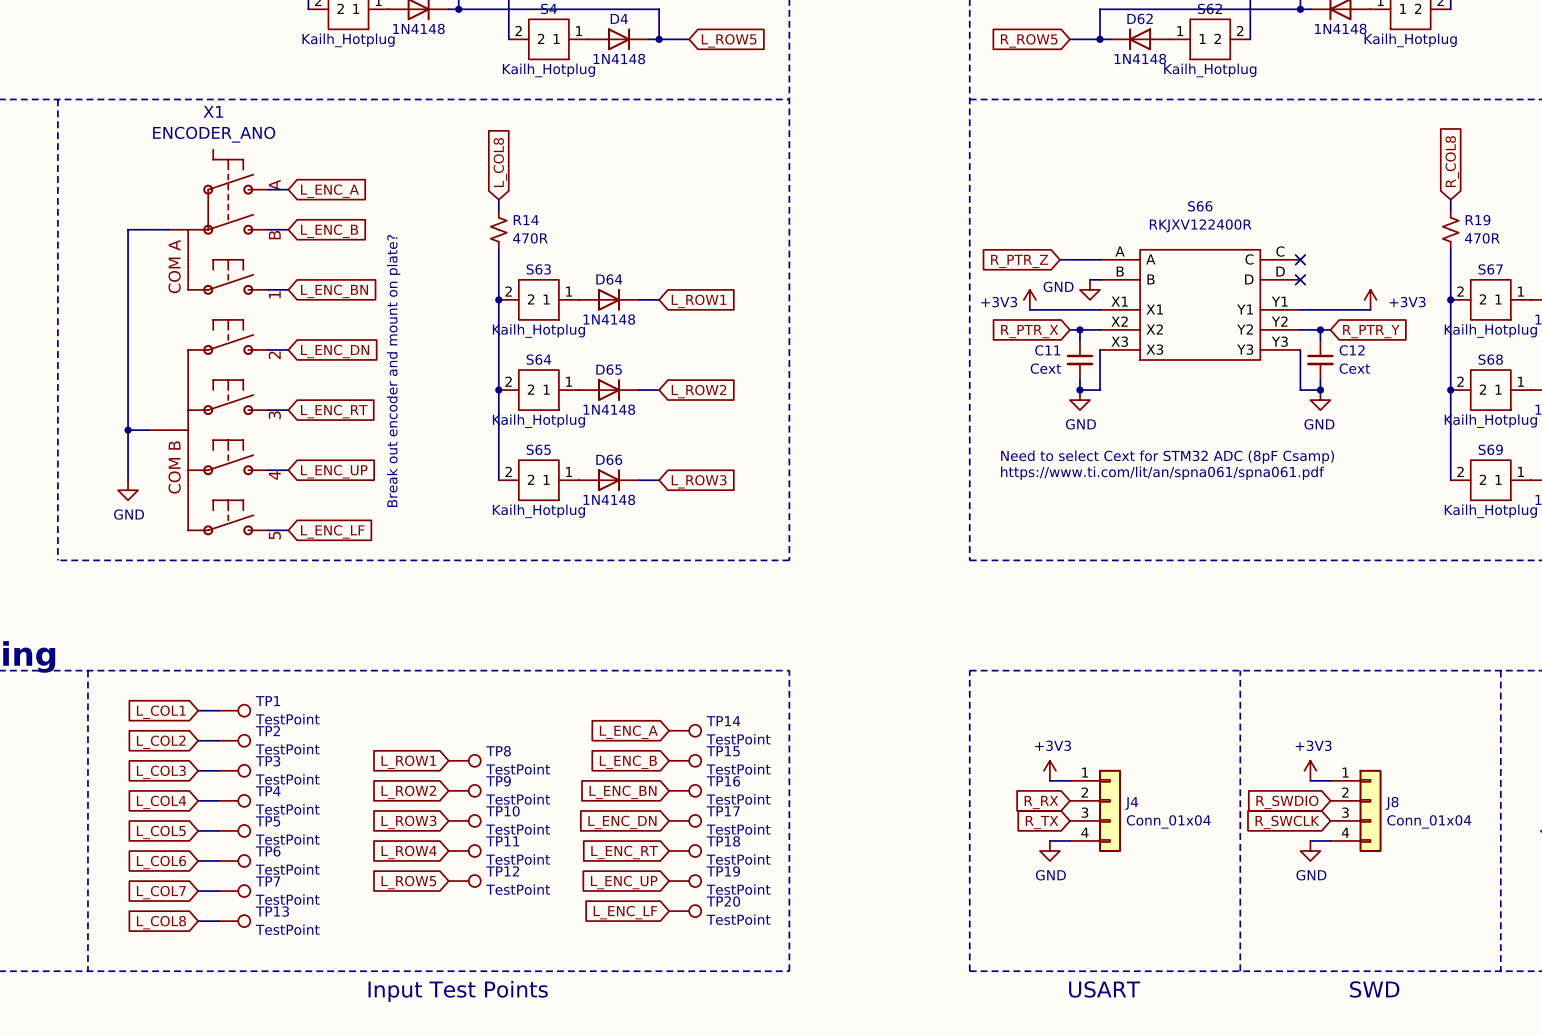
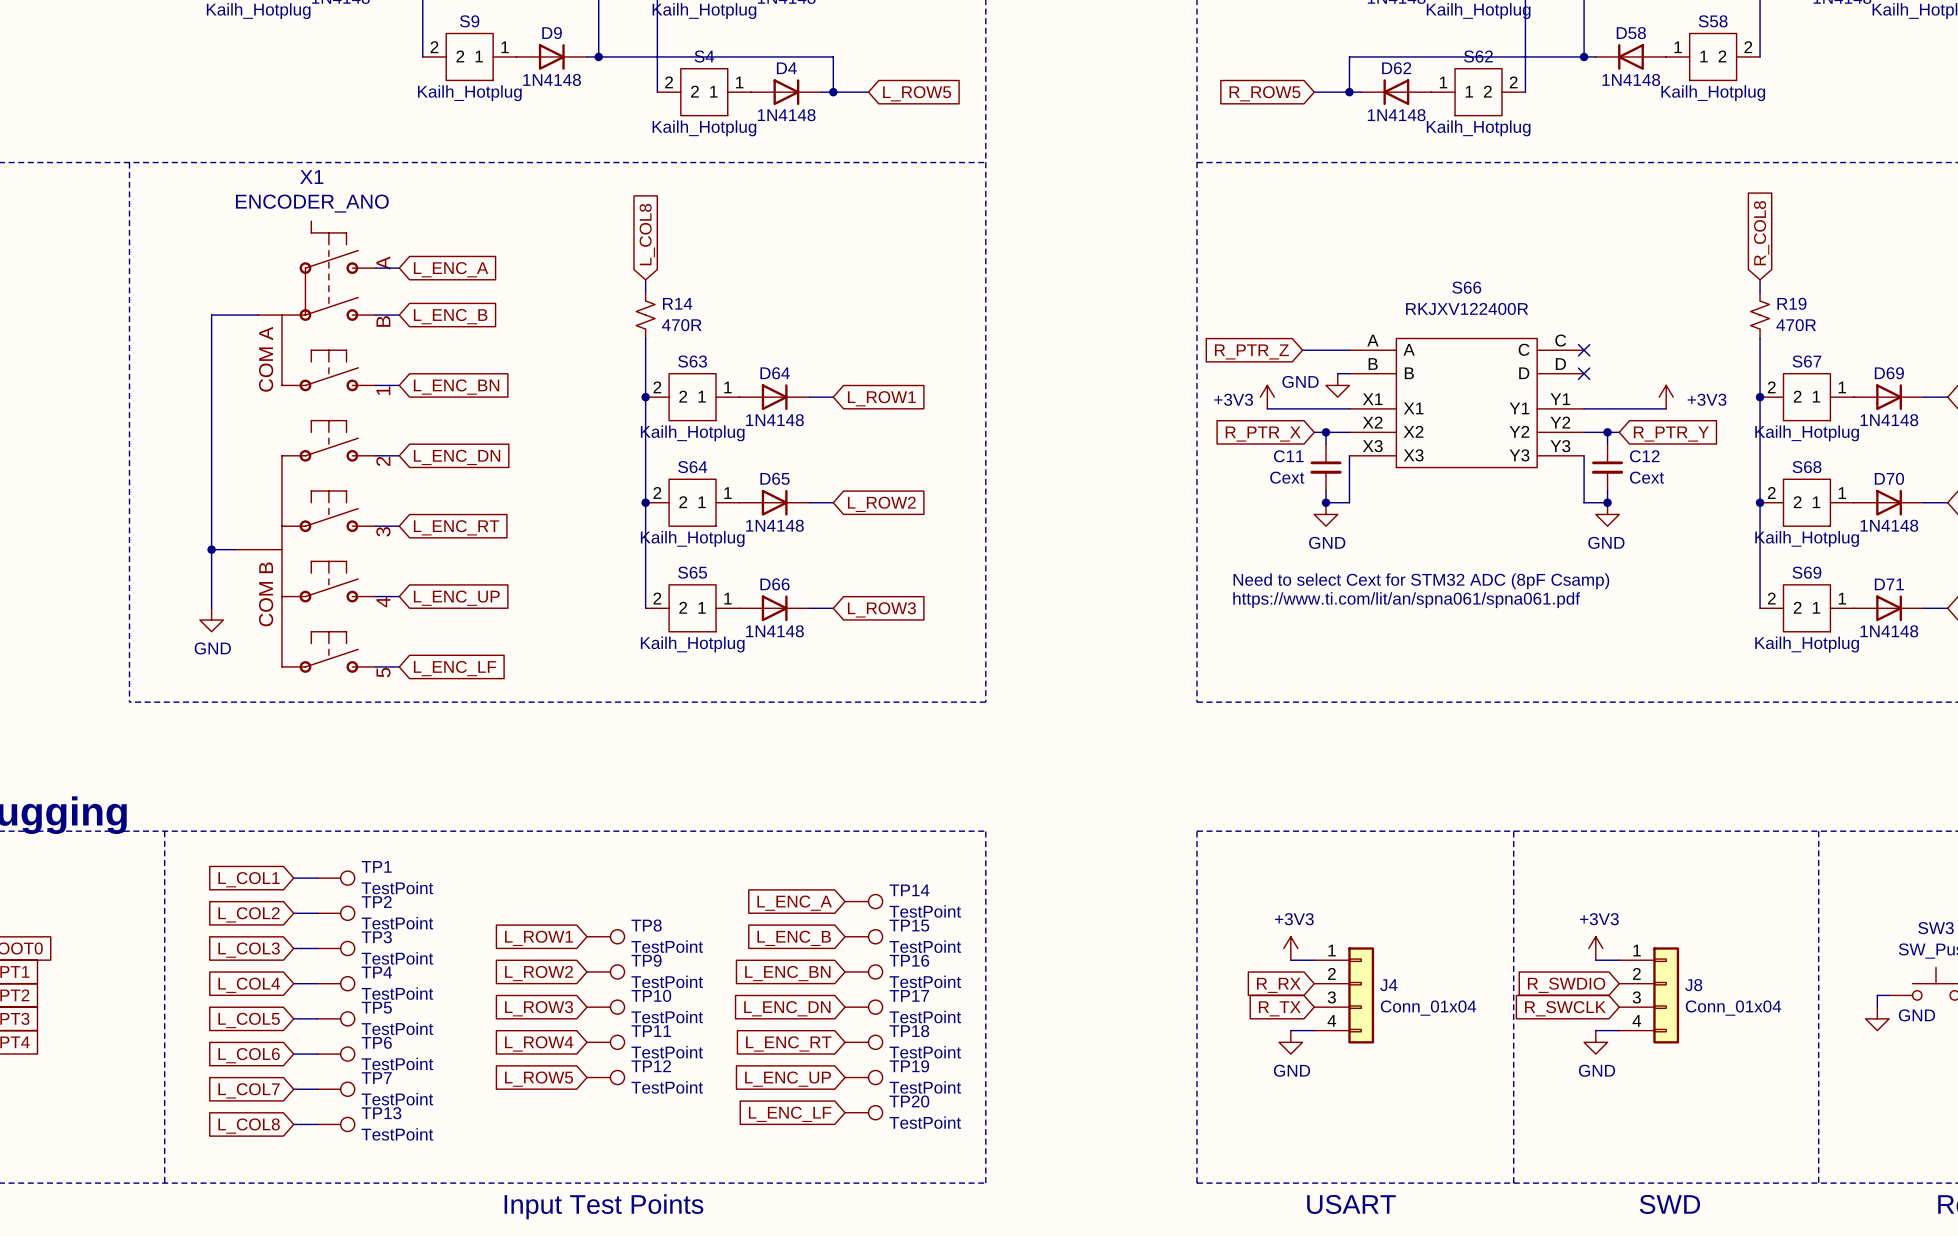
text: Break out encoder and mount on plate? (393, 370) -> none

